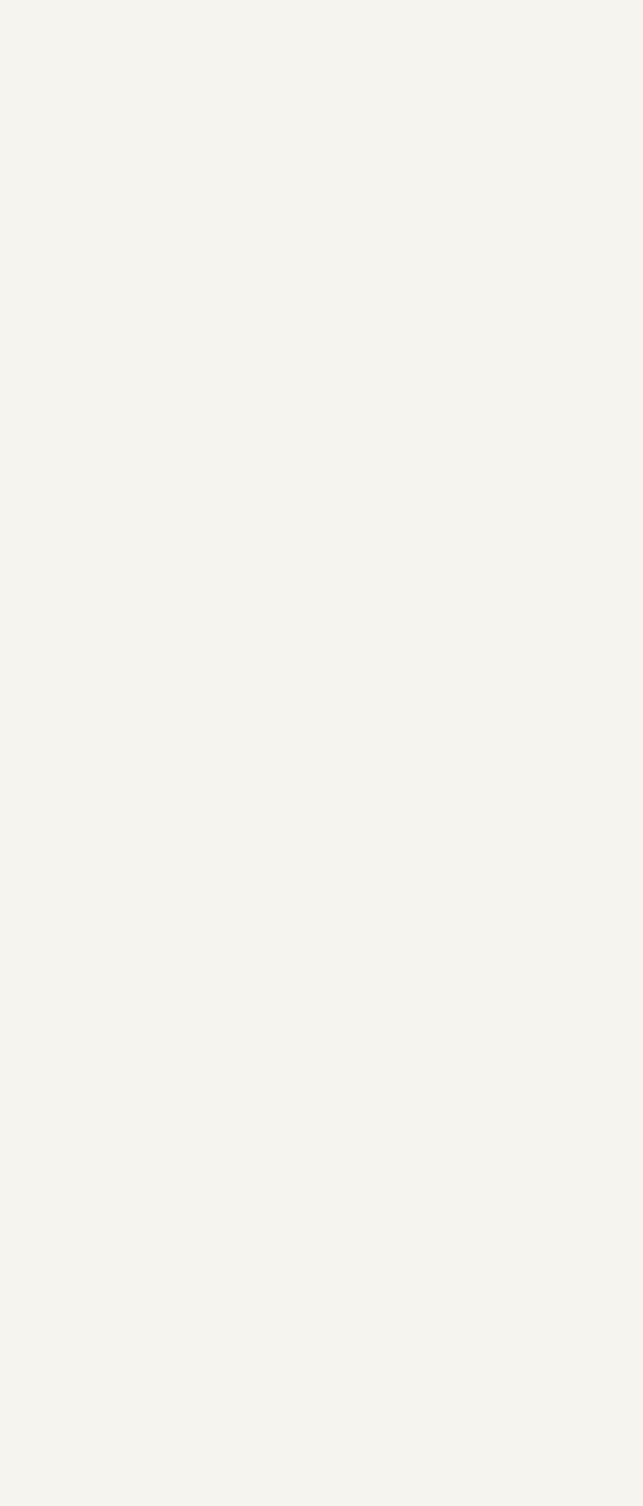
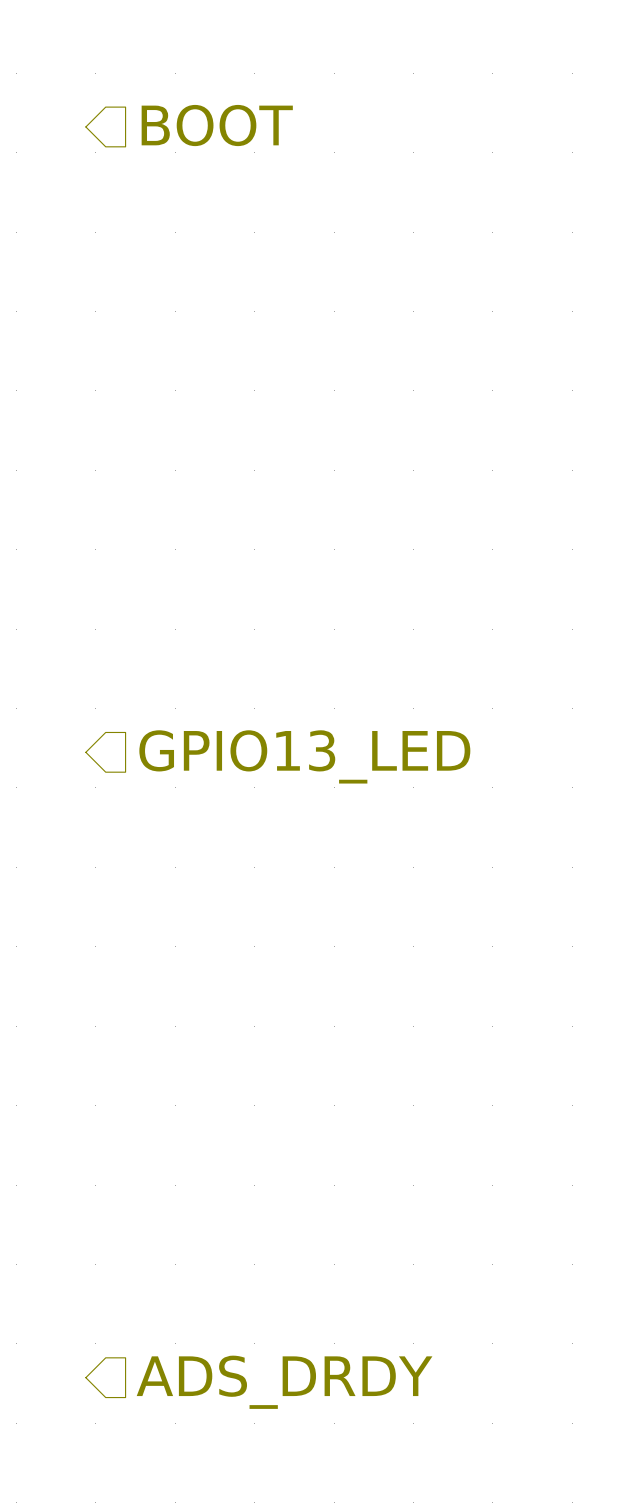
hierarchical label: none -> BOOT (217, 125)
hierarchical label: none -> GPIO13_LED (304, 756)
hierarchical label: none -> ADS_DRDY (284, 1382)

